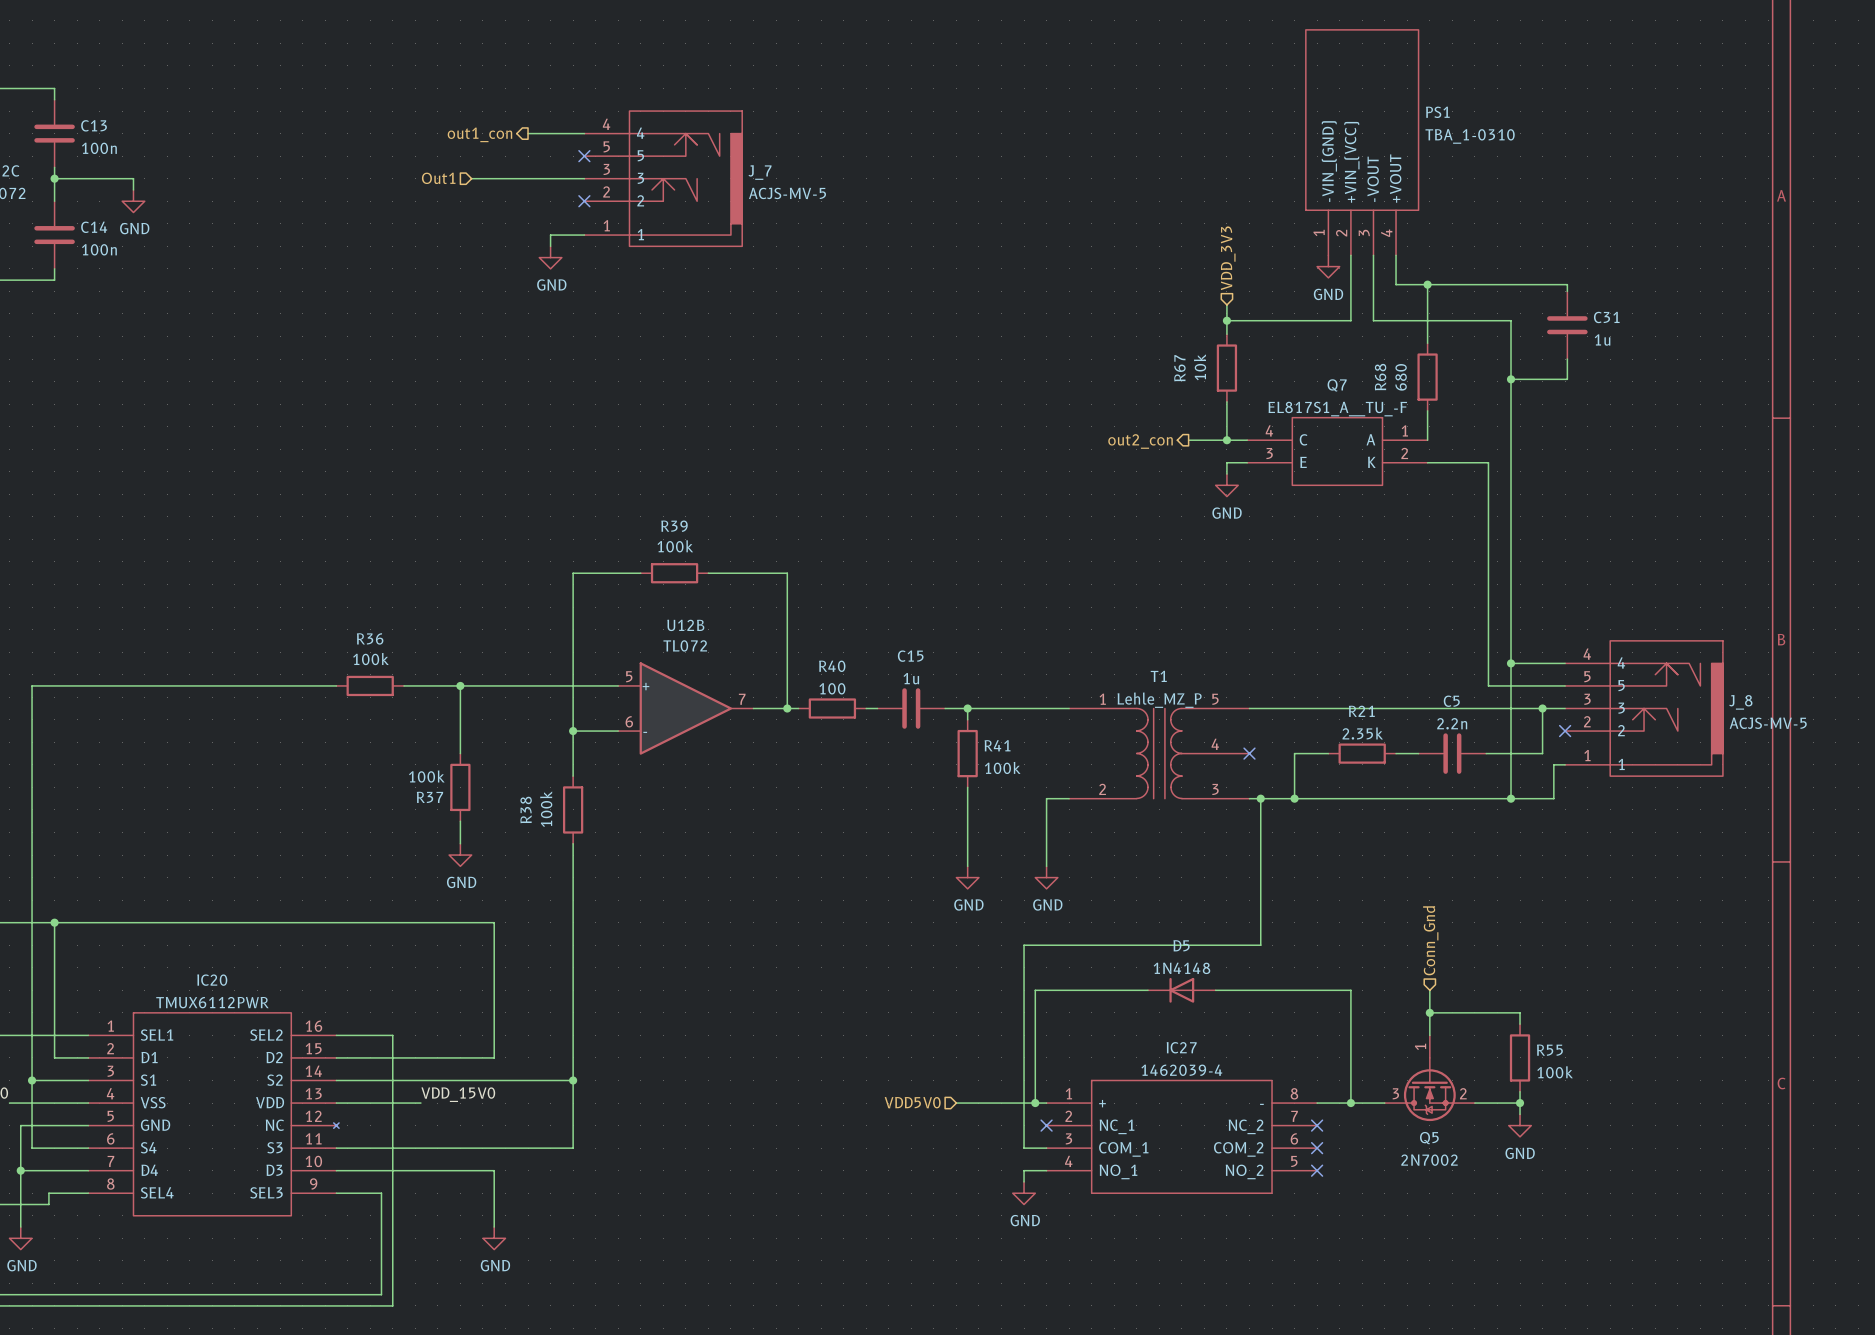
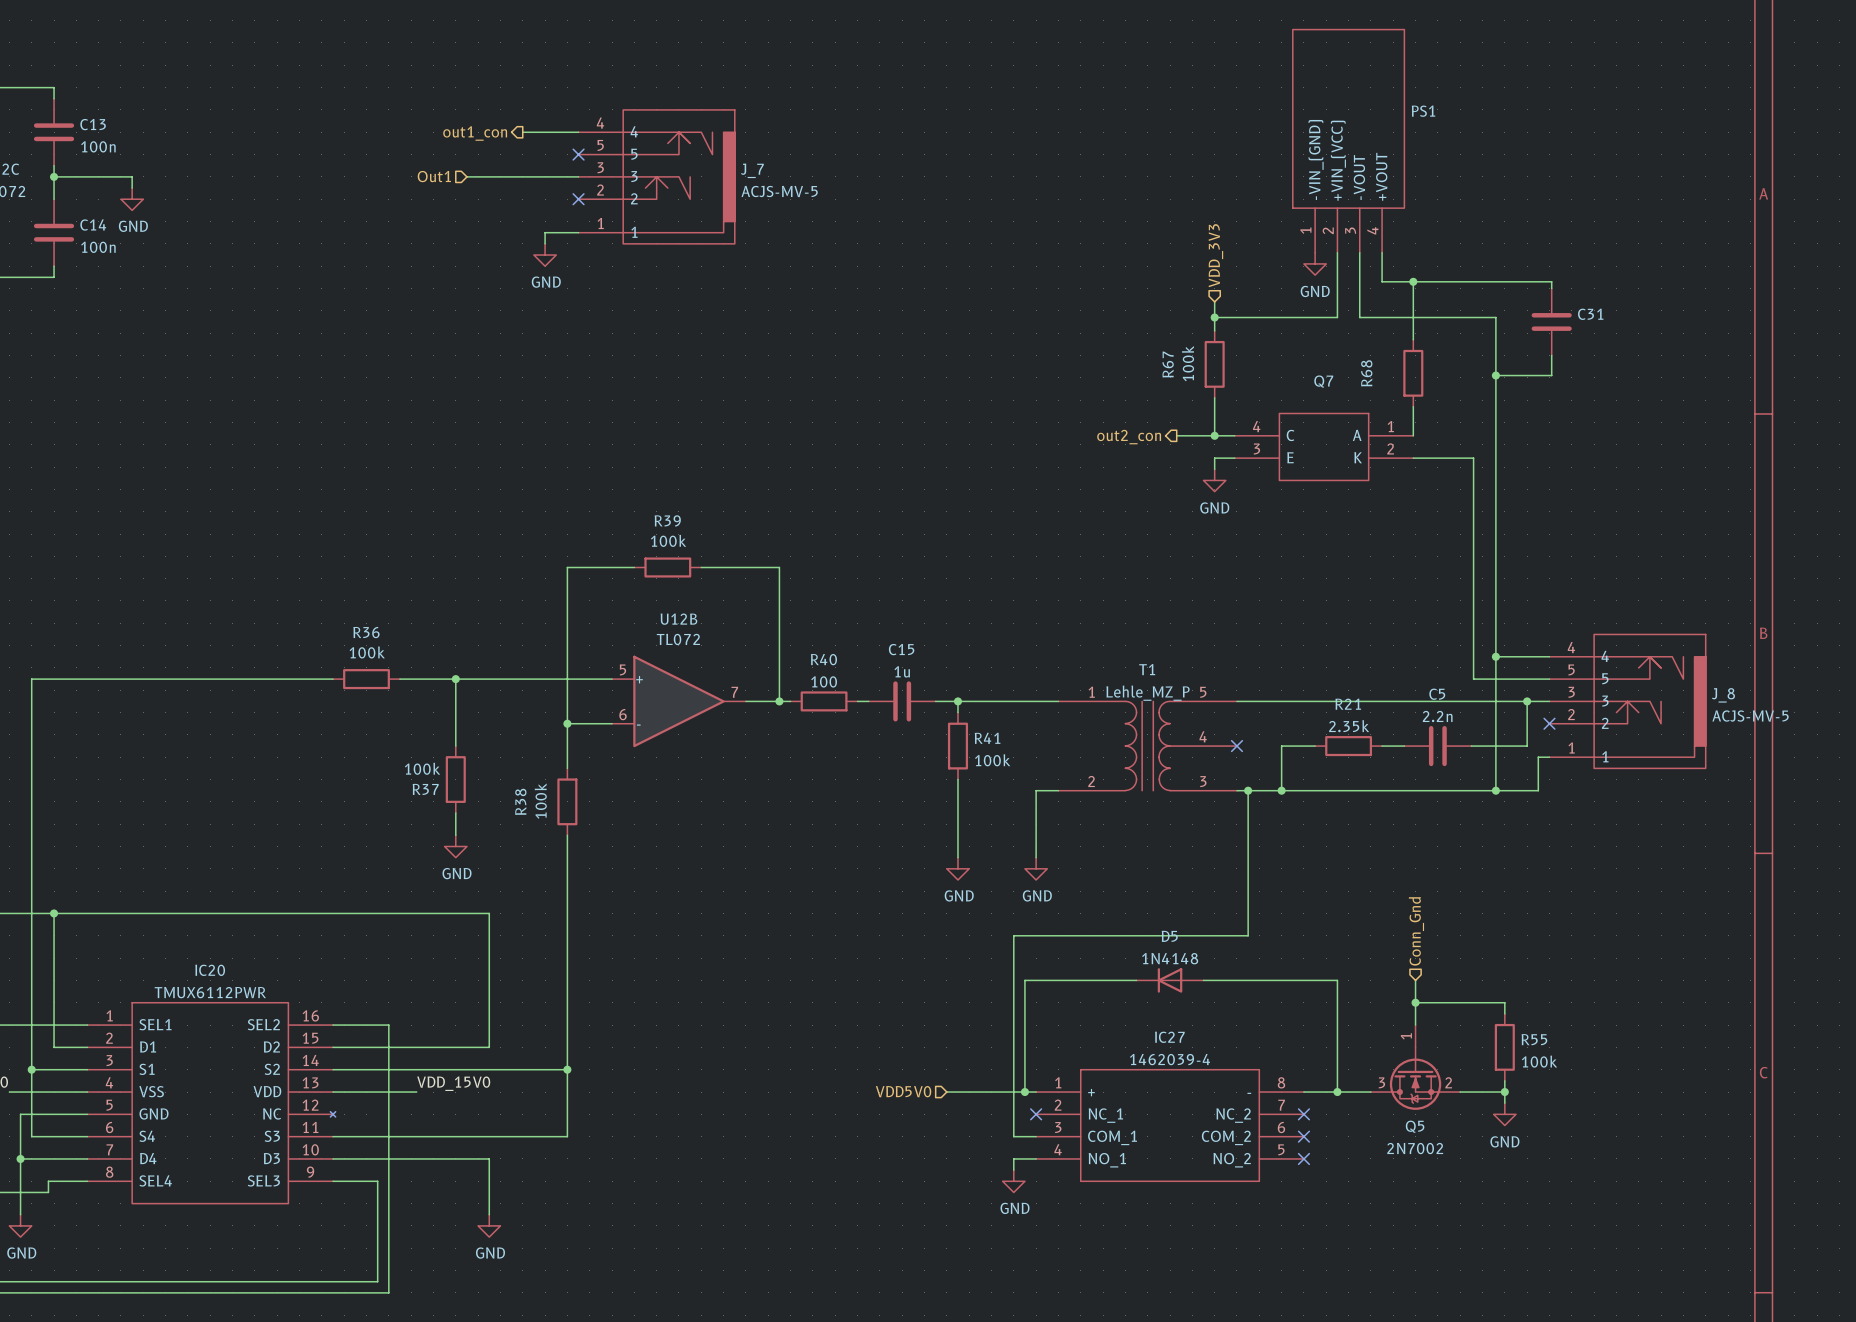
PS1 value: TBA_1-0310 (1470, 136) -> none
C31 value: 1u (1602, 339) -> none
R67 value: 10k (1200, 367) -> 100k (1188, 363)
R68 value: 680 (1401, 377) -> none
Q7 value: EL817S1_A__TU_-F (1337, 409) -> none

